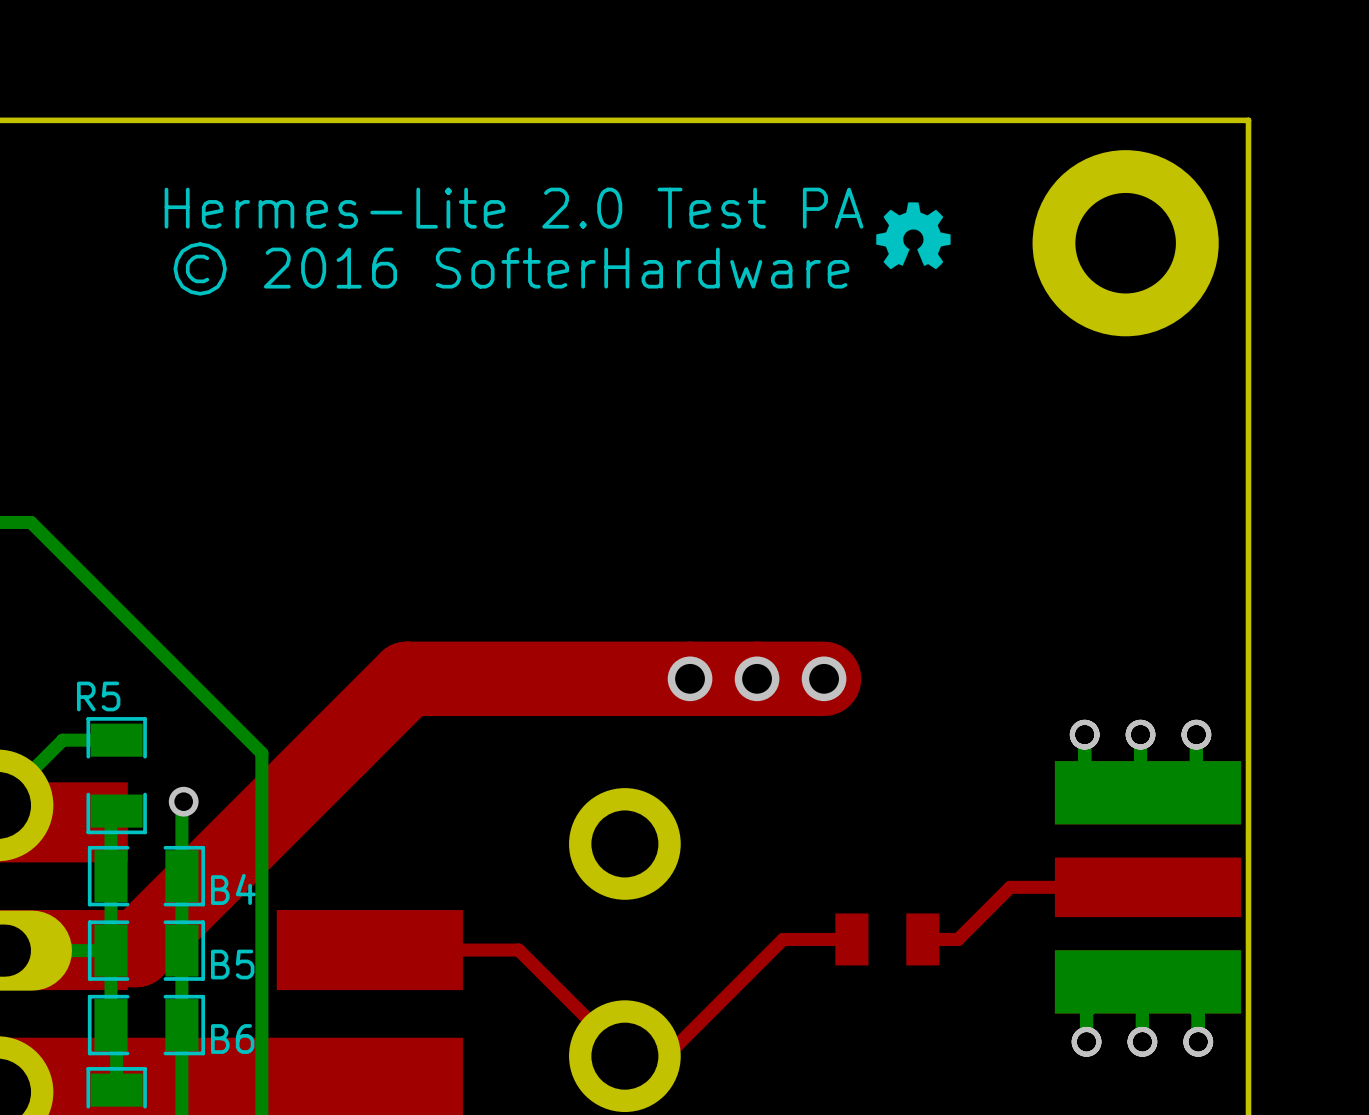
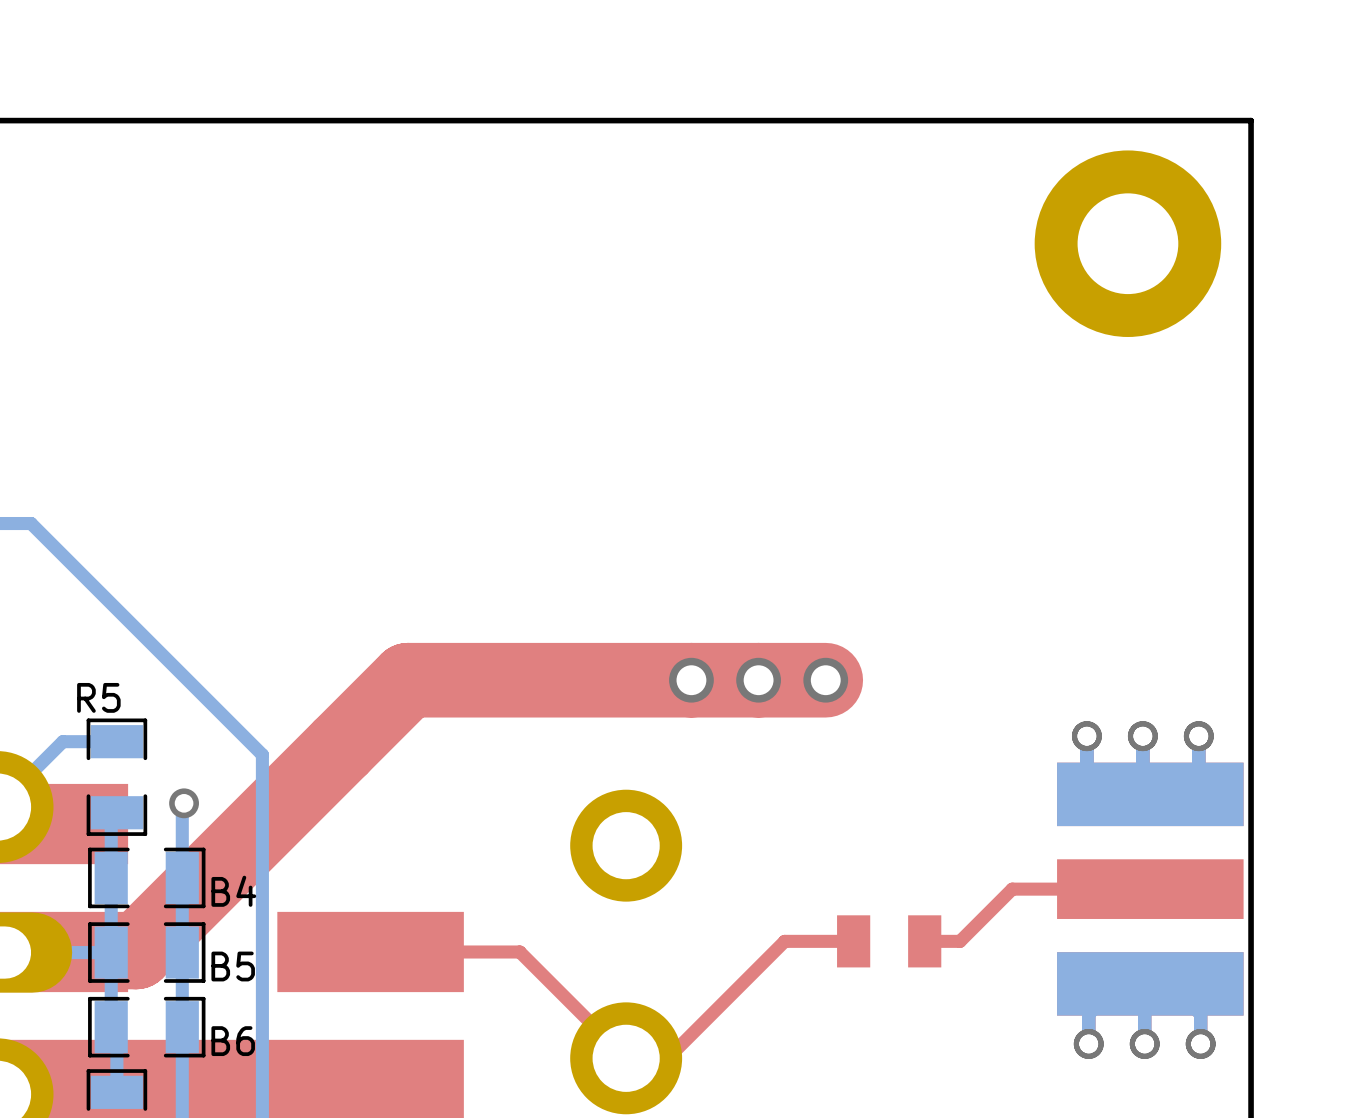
drawing: [876, 202, 951, 270] -> none
text: Hermes-Lite 2.0 Test PA (513, 208) -> none
text: © 2016 SofterHardware (511, 268) -> none

